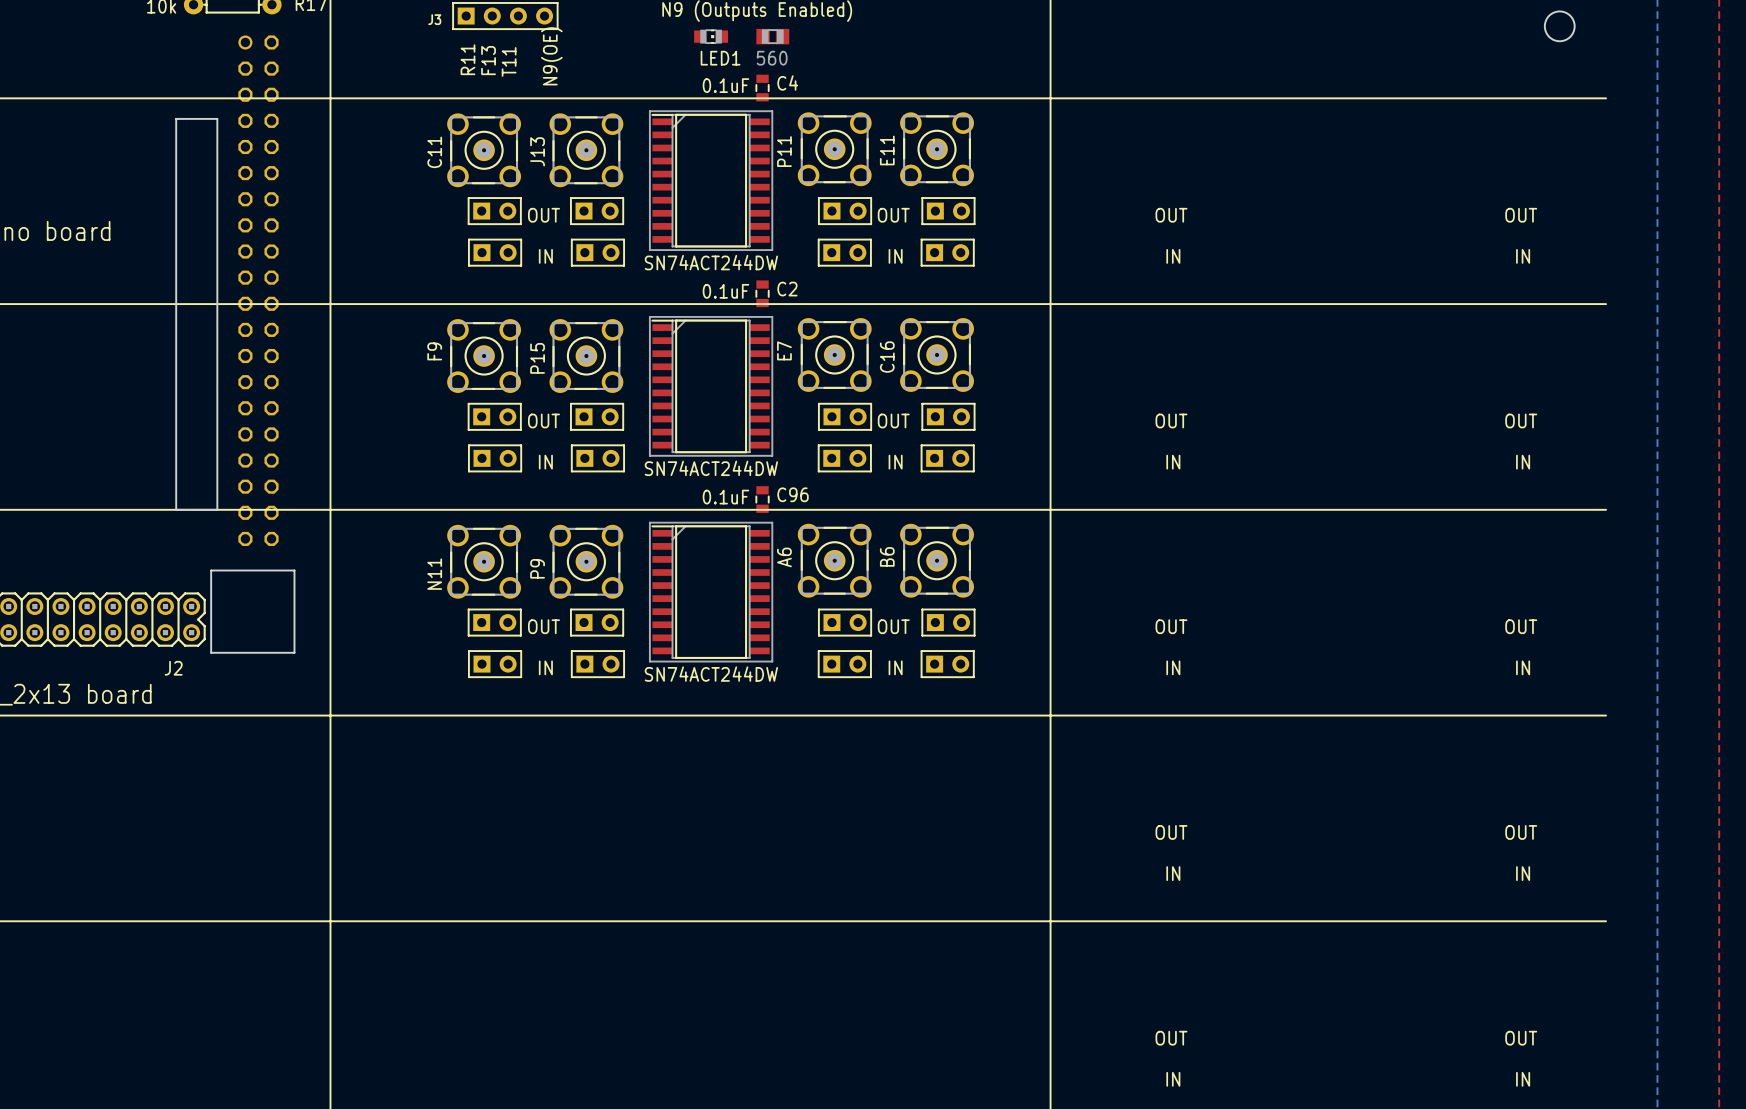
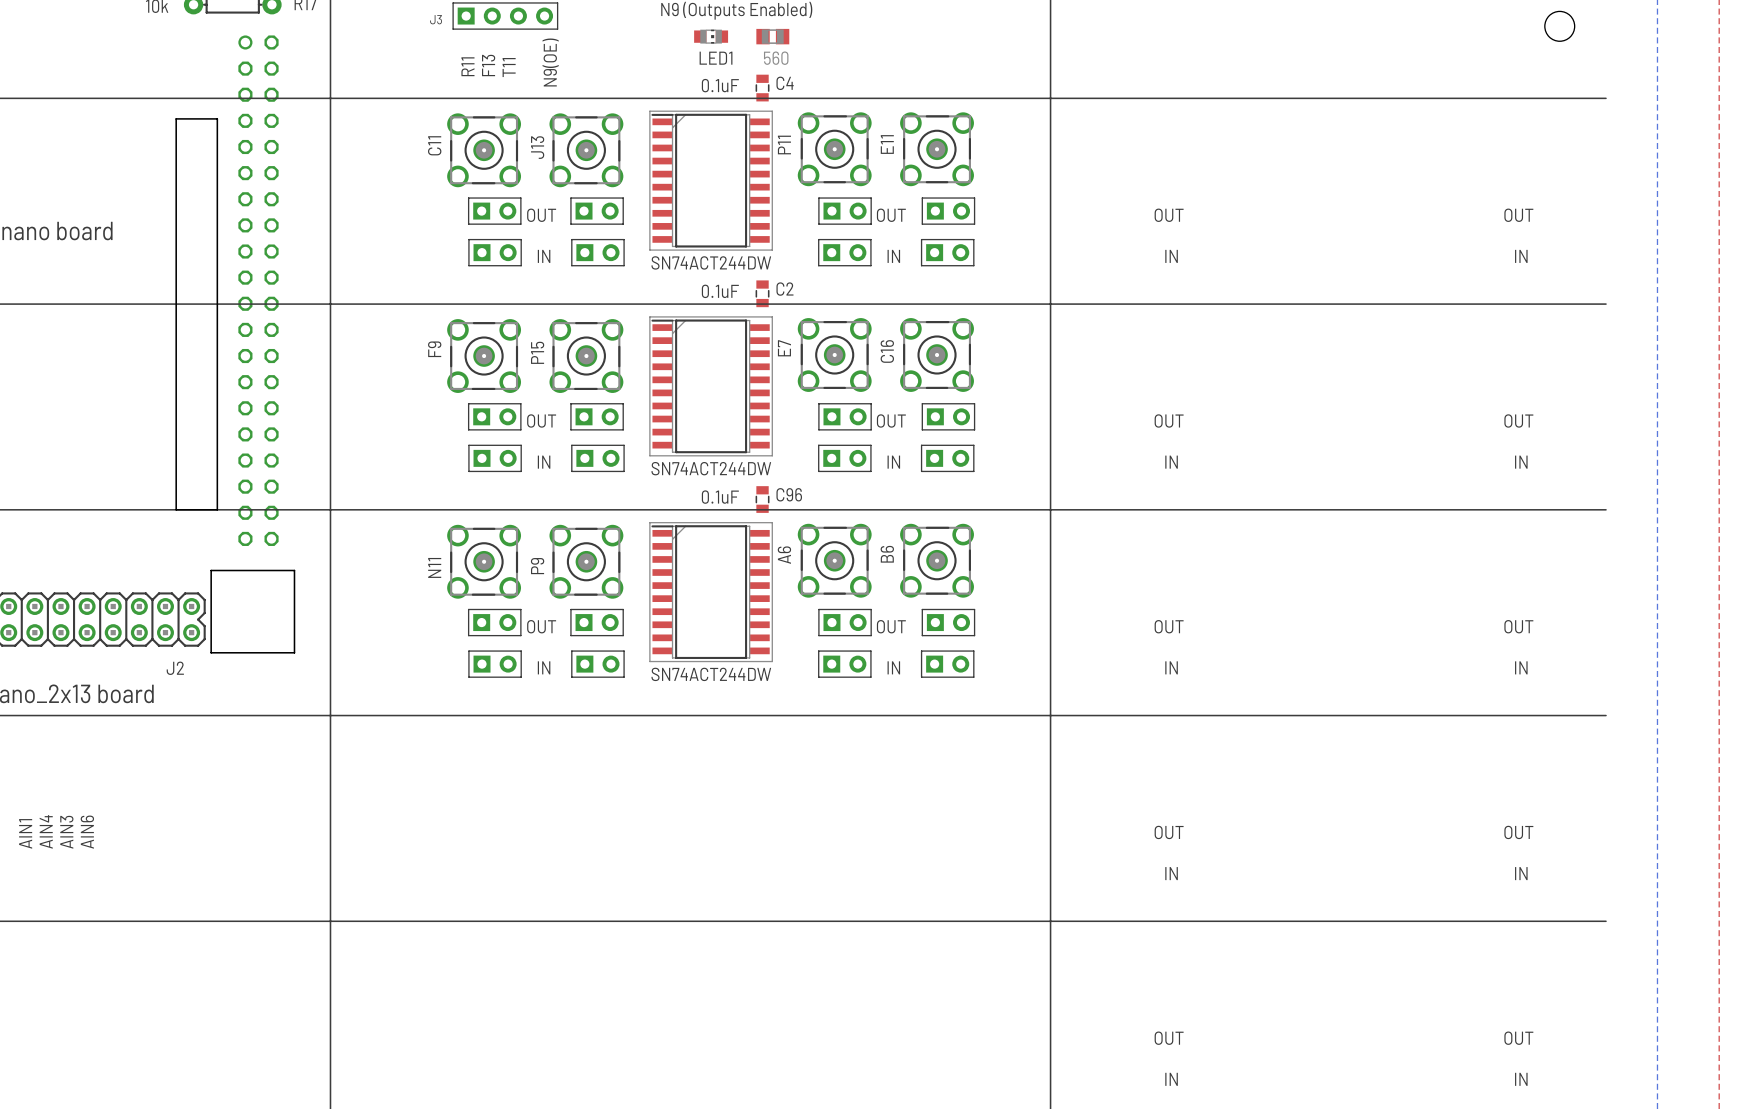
text: none -> AIN1 (25, 833)
text: none -> AIN4 (46, 831)
text: none -> AIN3 (66, 832)
text: none -> AIN6 (87, 832)

